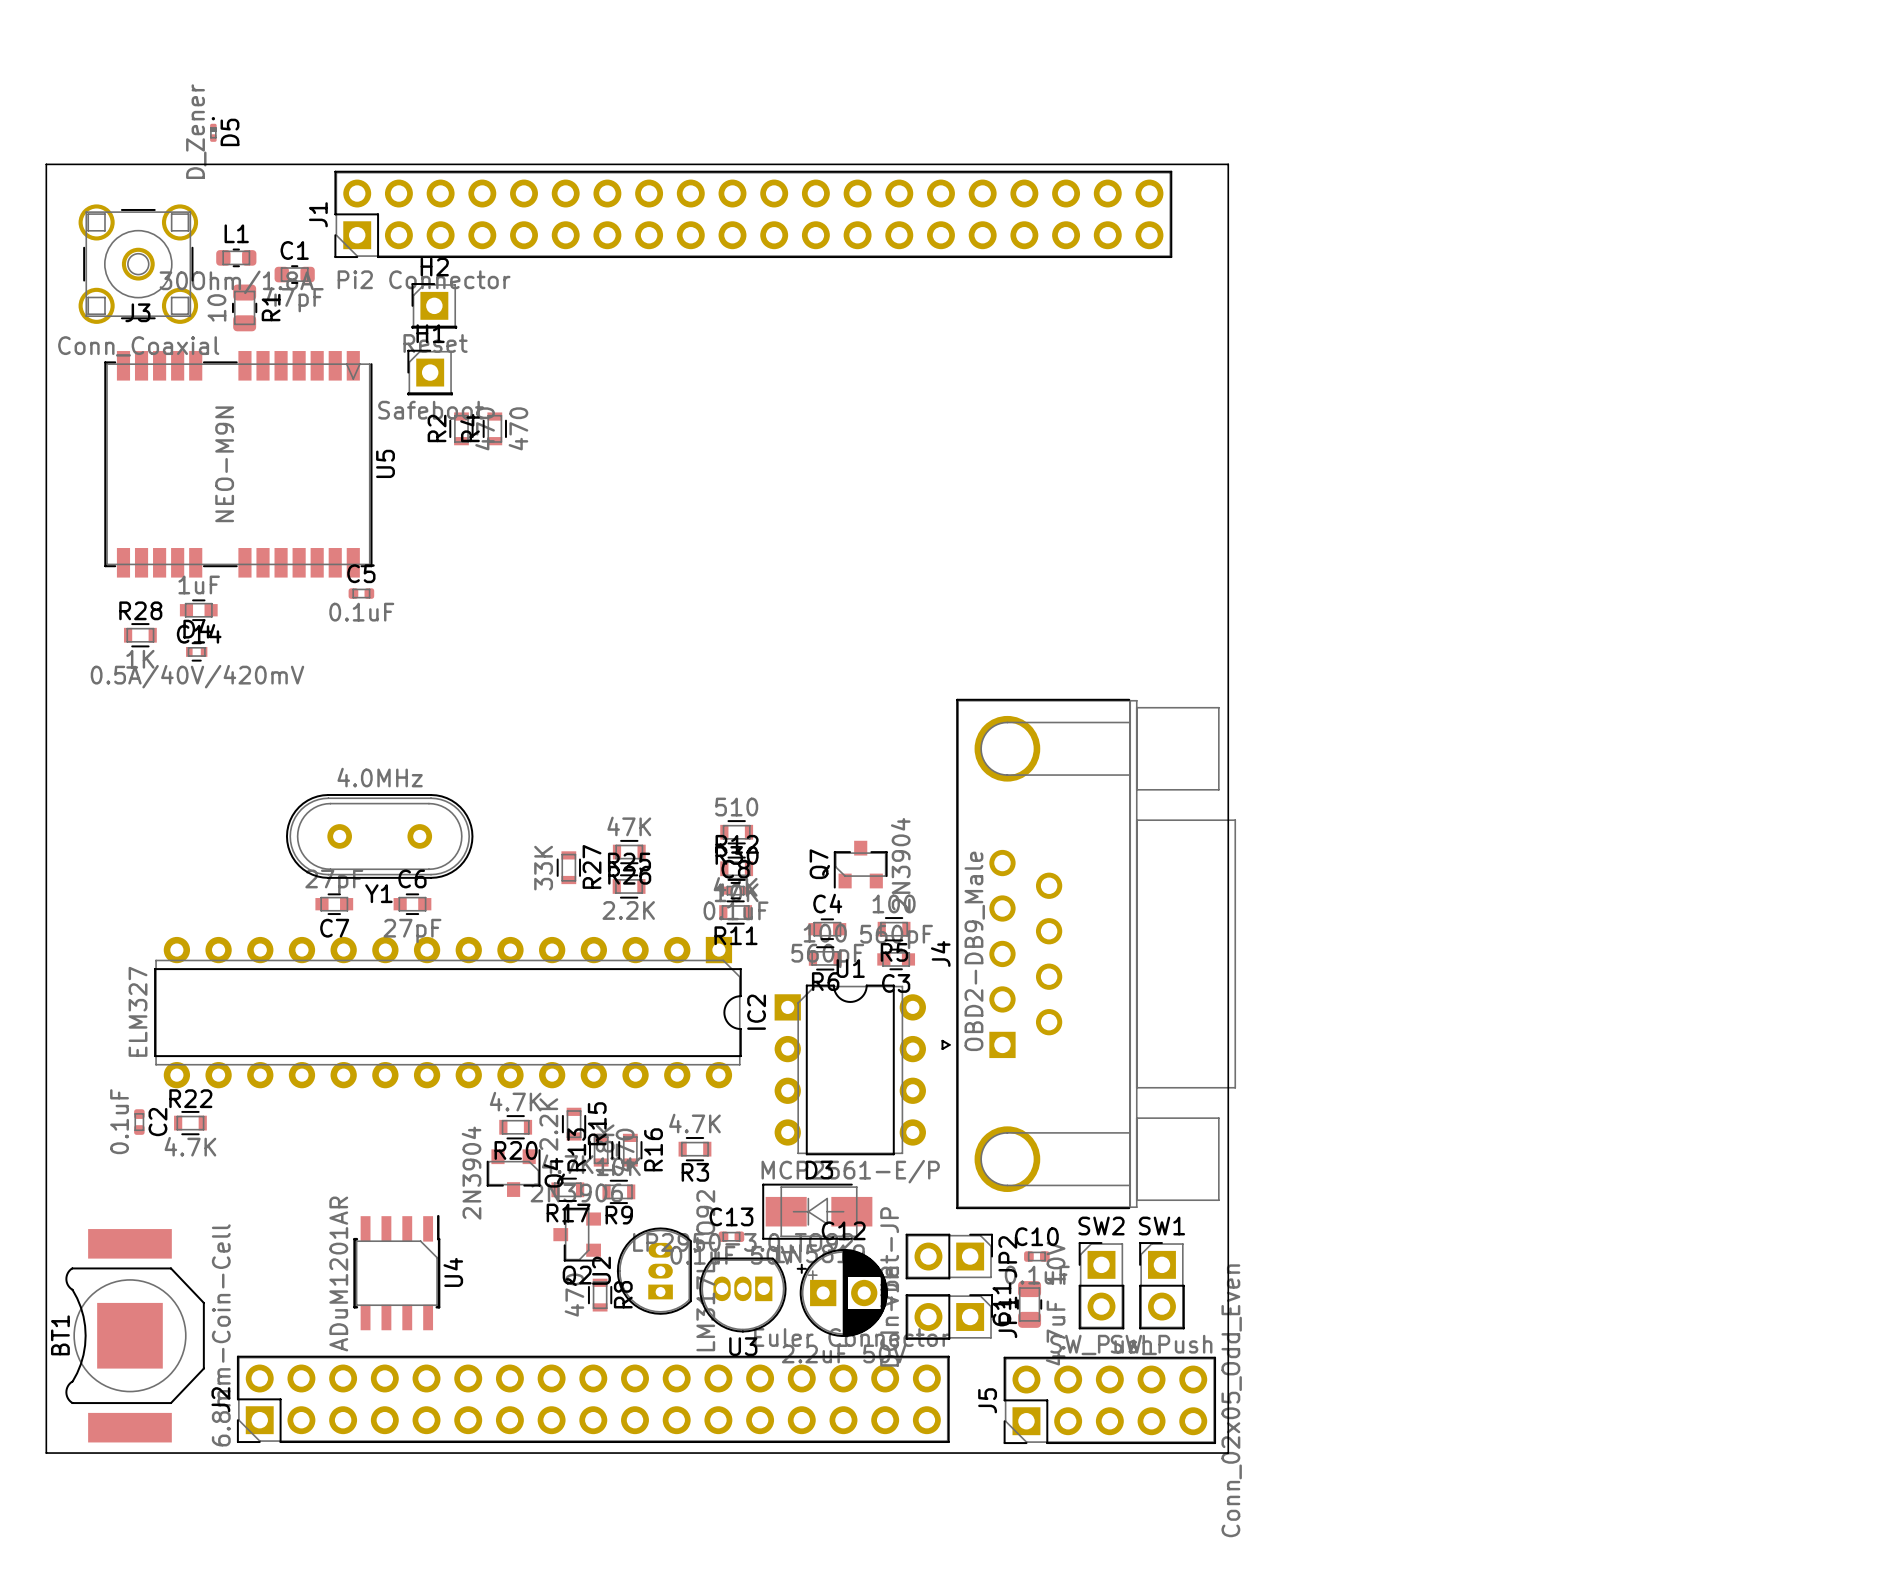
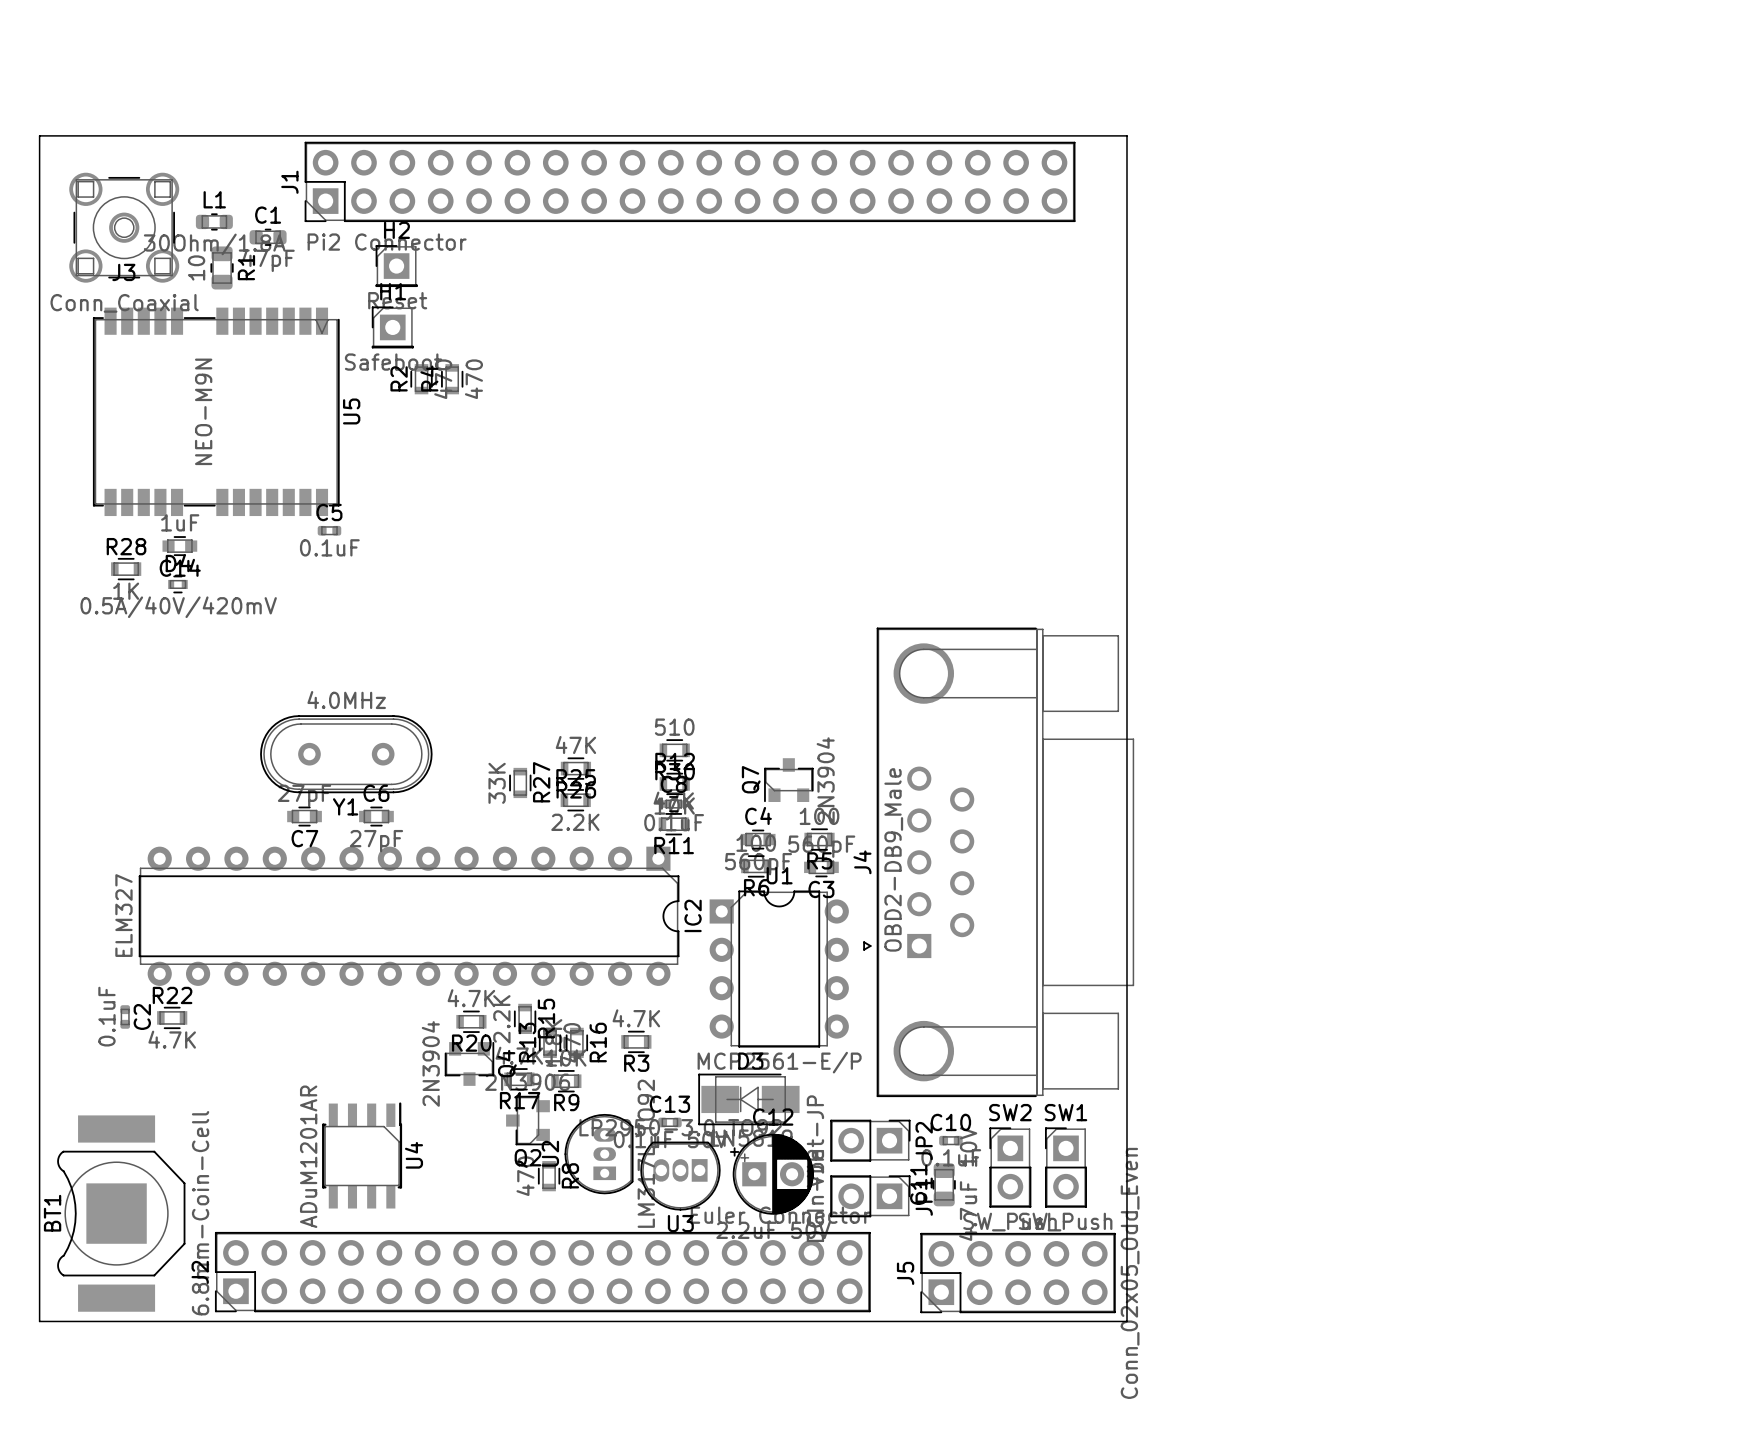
D5: D_Zener (213, 129) -> none

